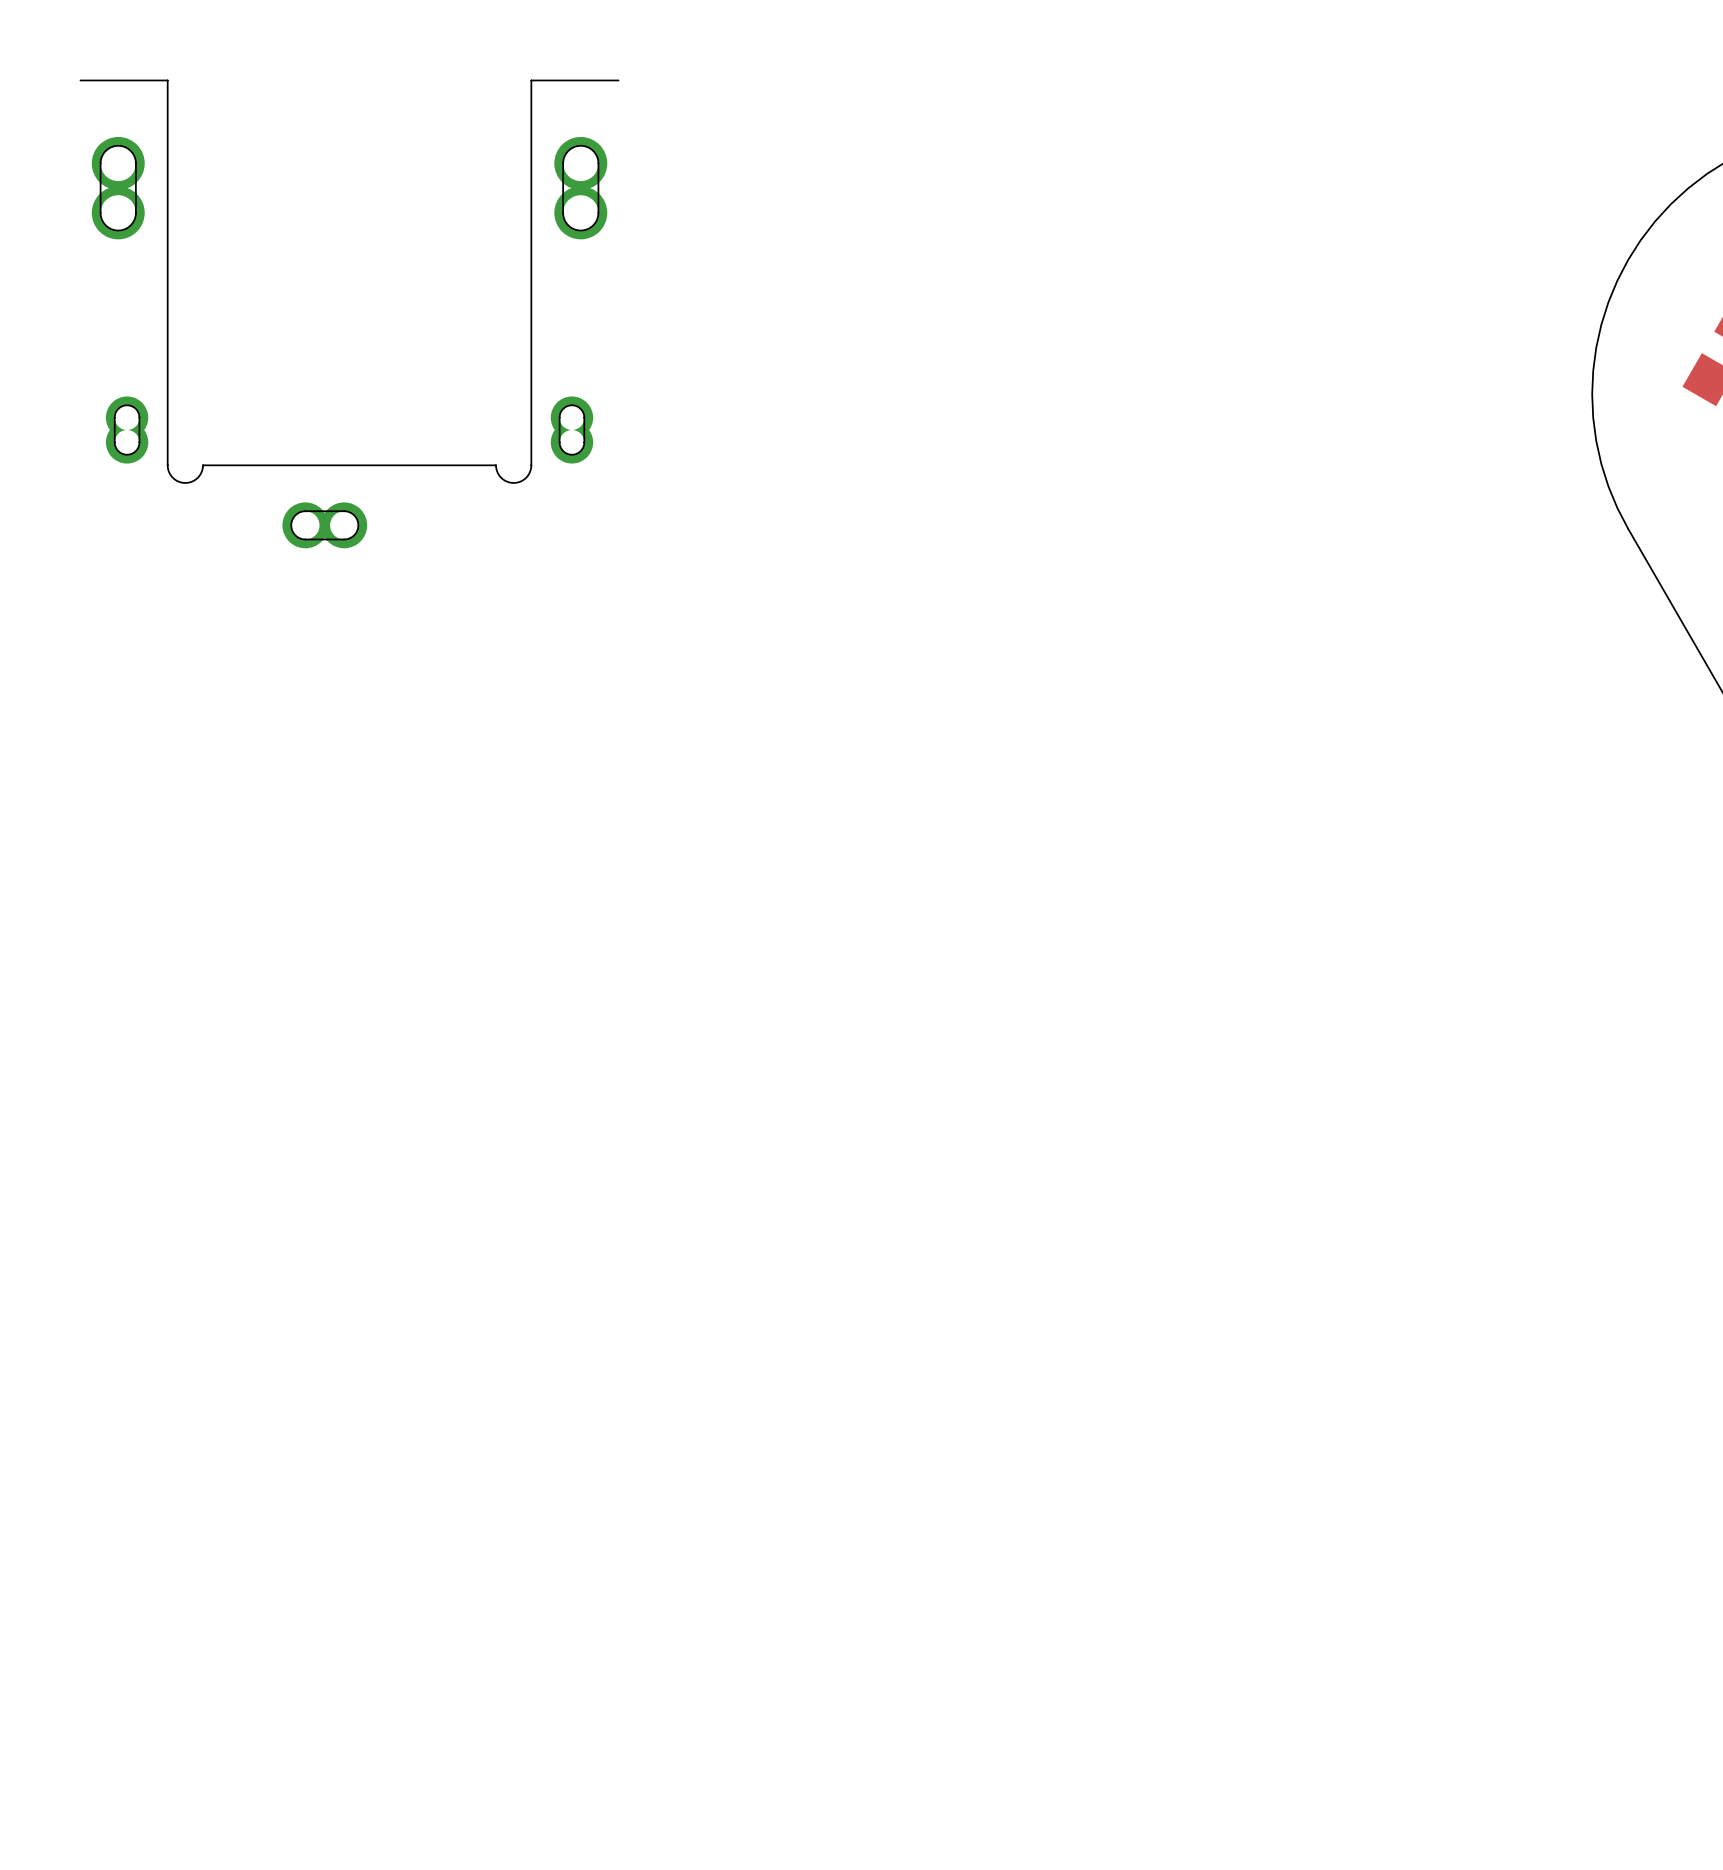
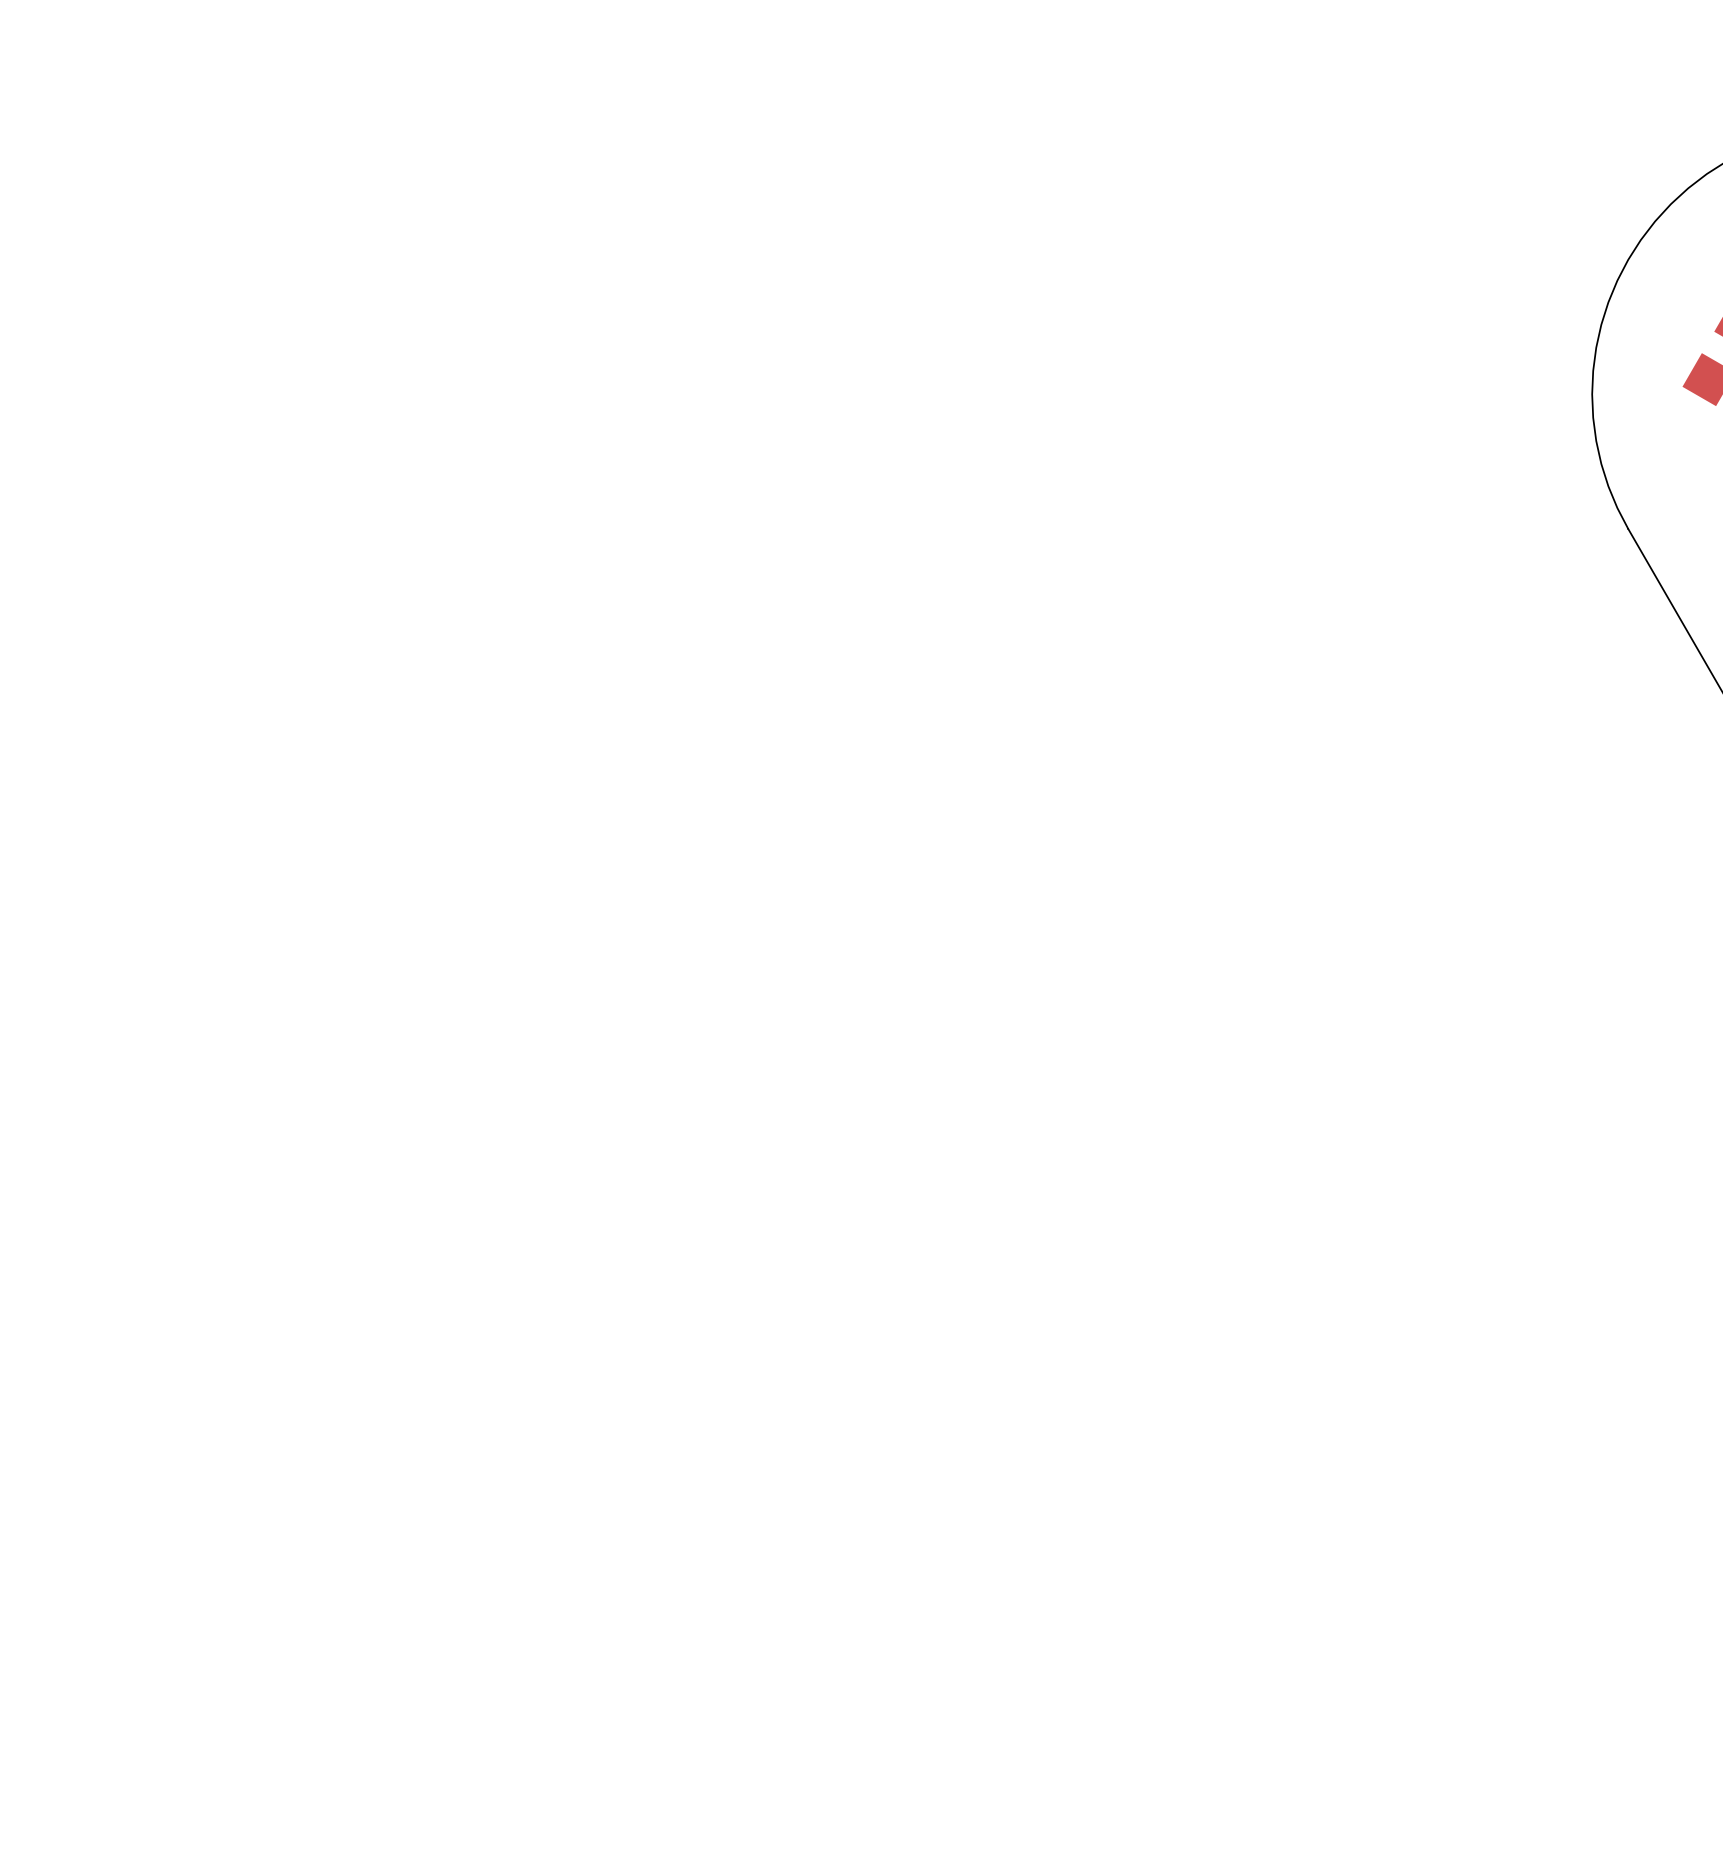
part: (349, 314) -> none

